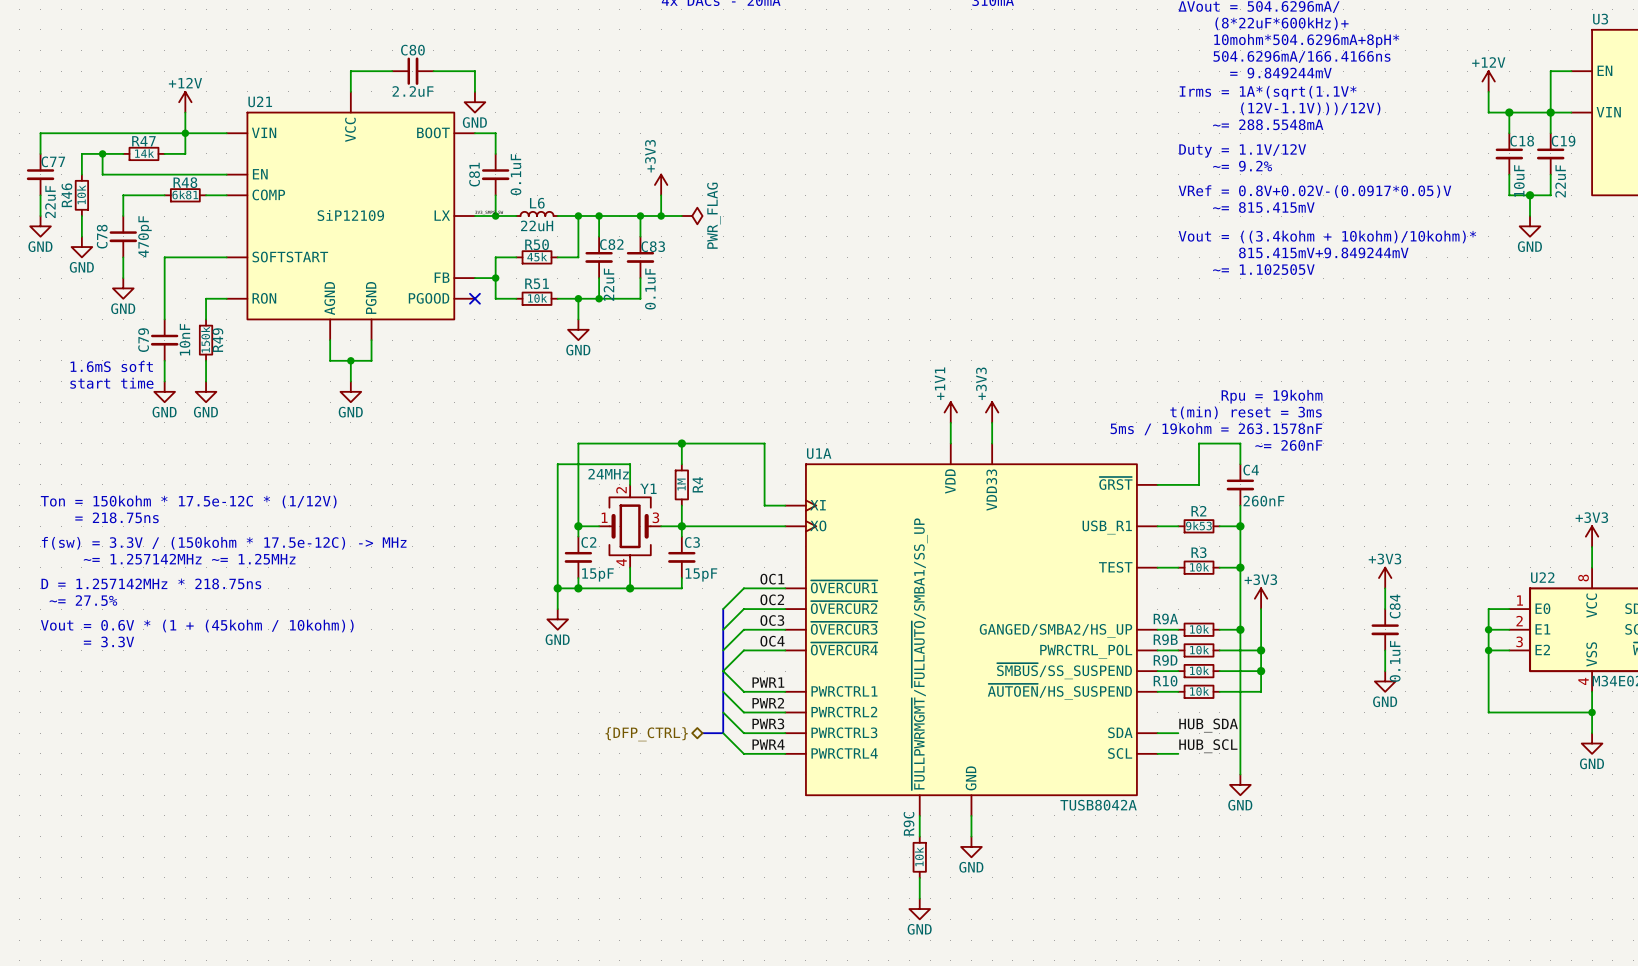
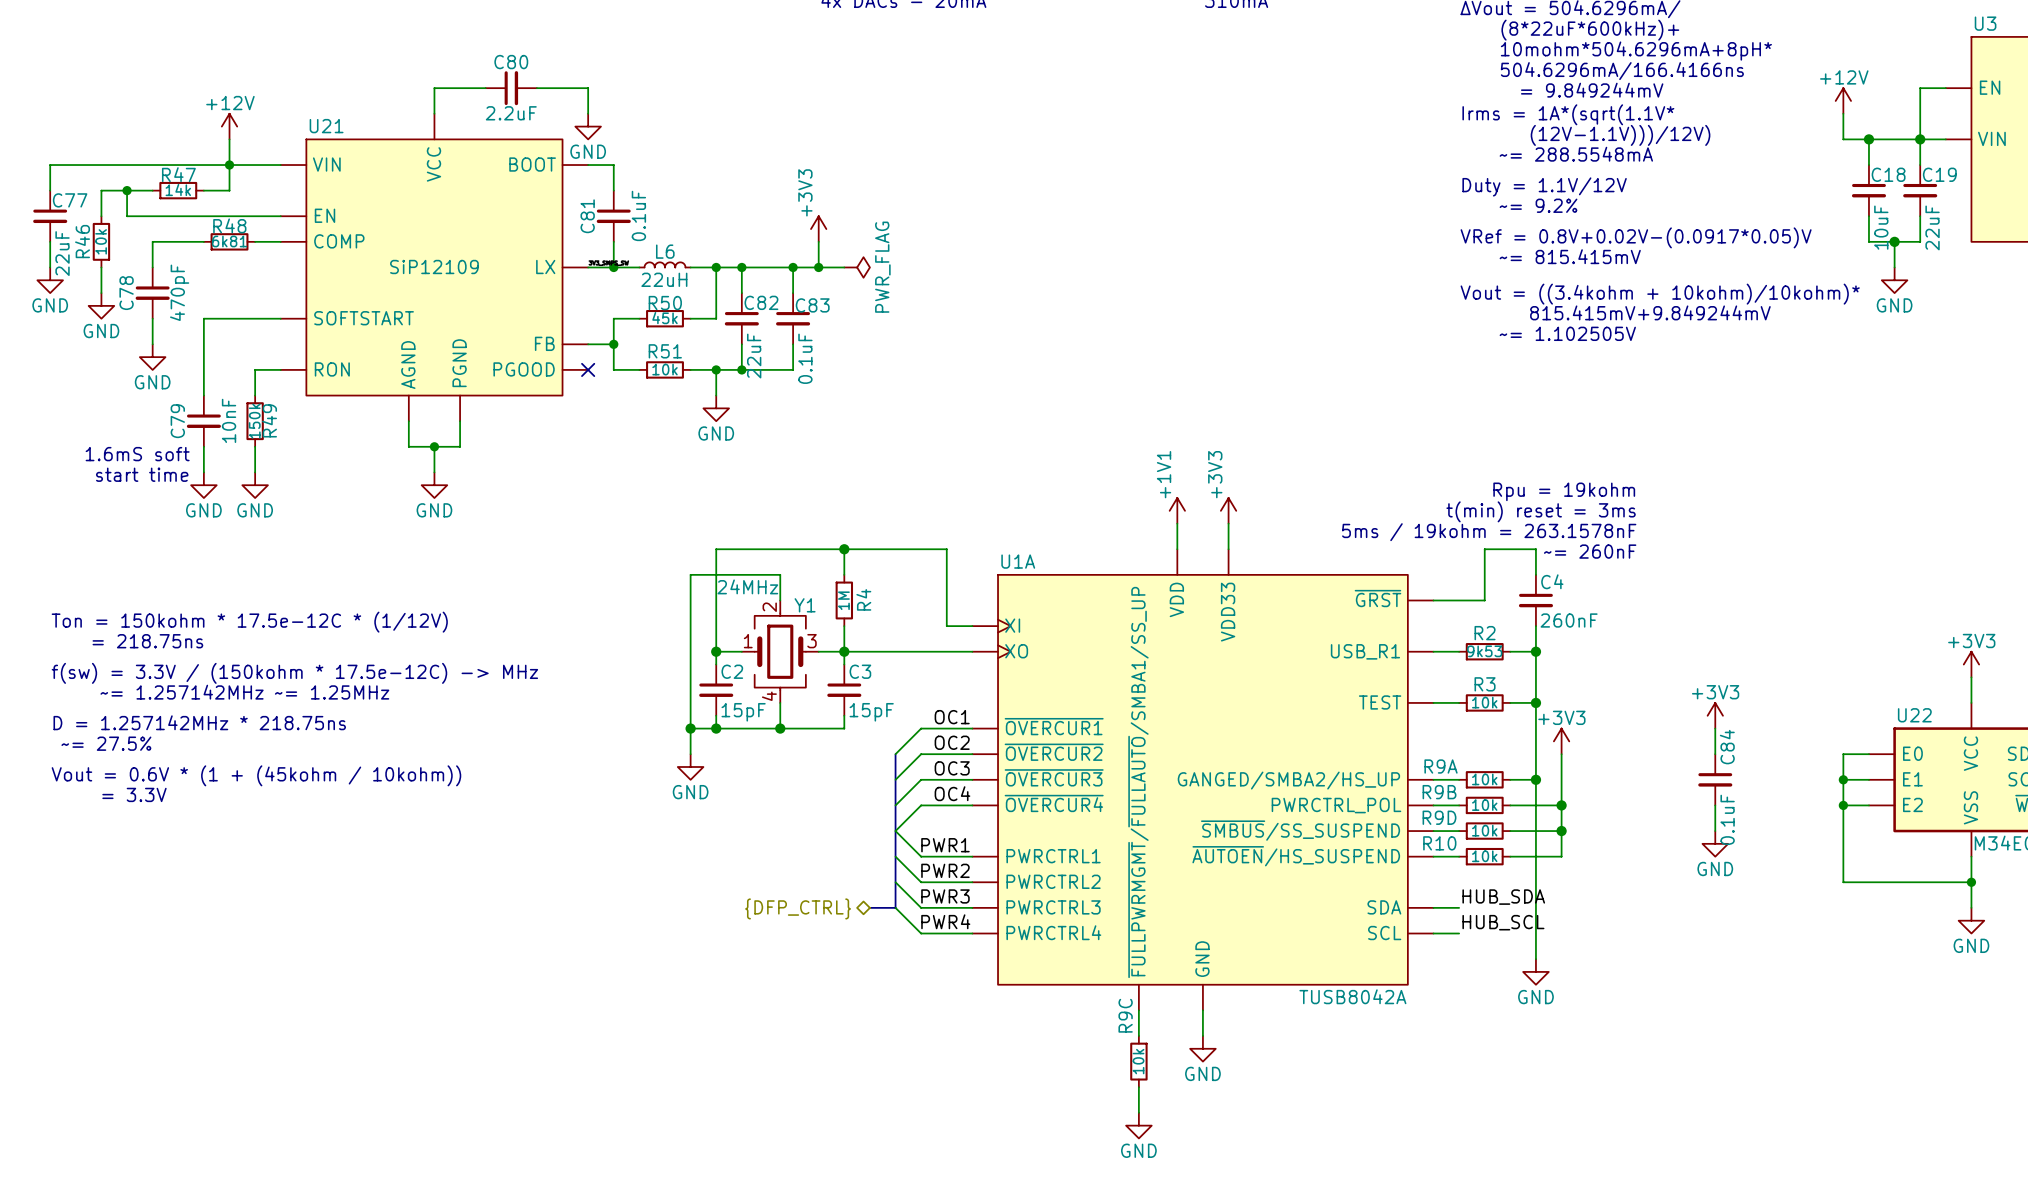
U22 pin number: 8 (1583, 578) -> none
U22 pin number: 1 (1520, 600) -> none
U22 pin number: 2 (1519, 621) -> none
U22 pin number: 3 (1519, 641) -> none
U22 pin number: 4 (1583, 681) -> none

